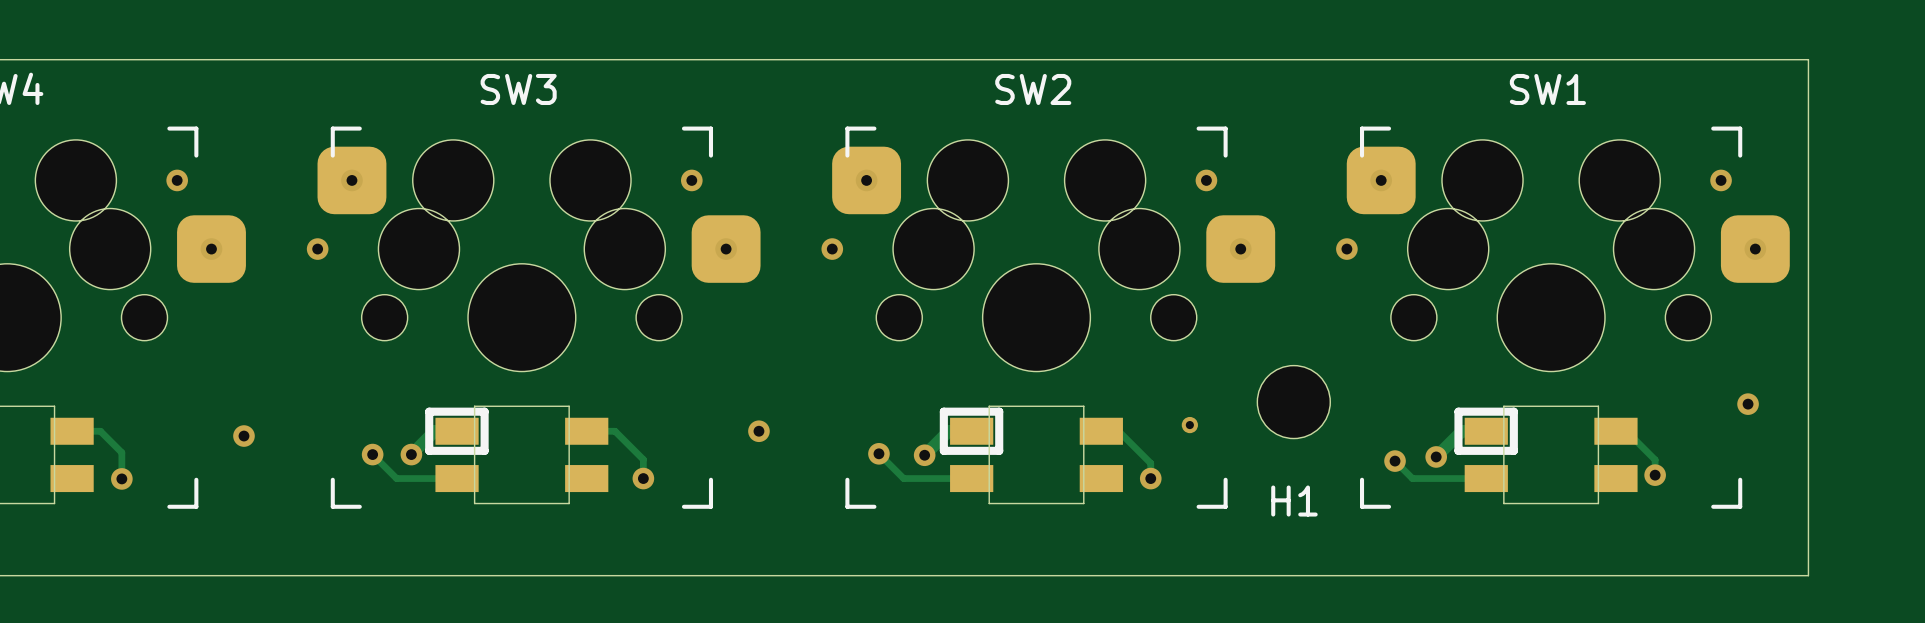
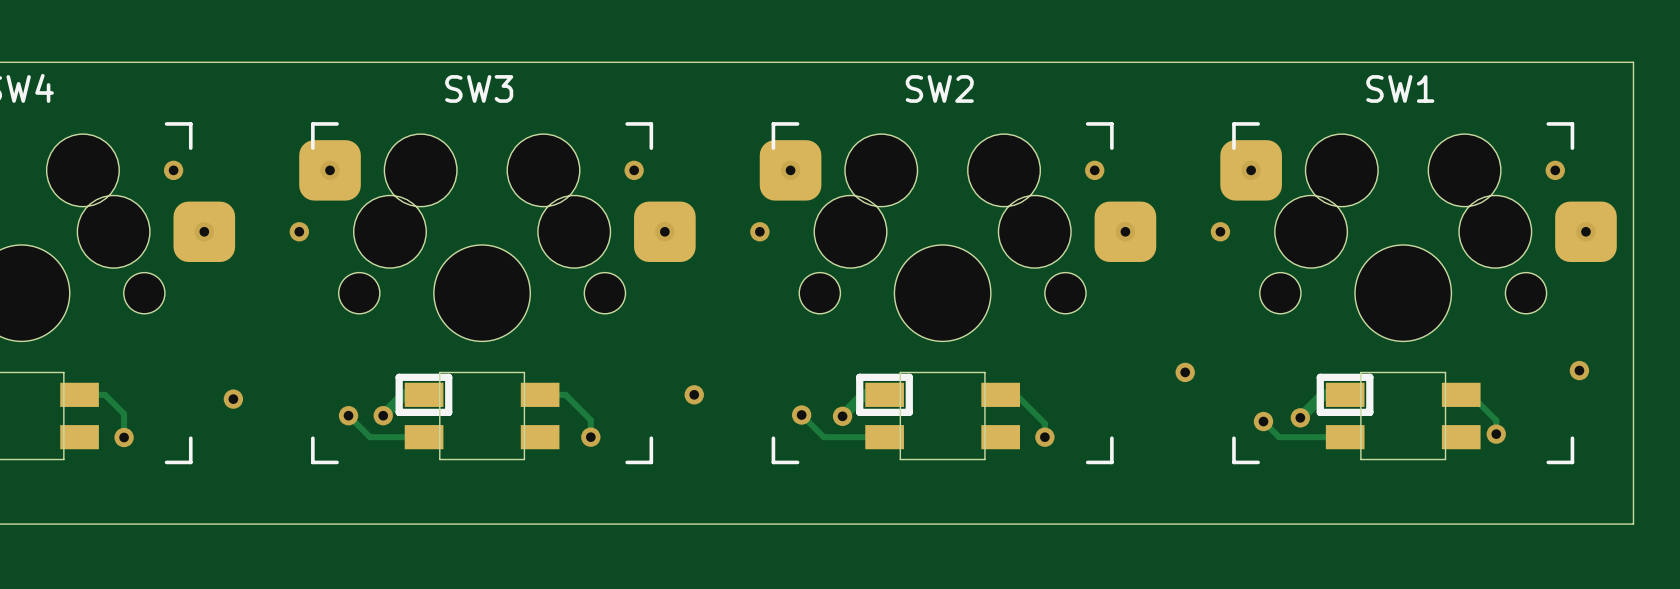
H1: (1293, 402) -> none
via: none -> (1185, 372)
via: (1189, 425) -> none

